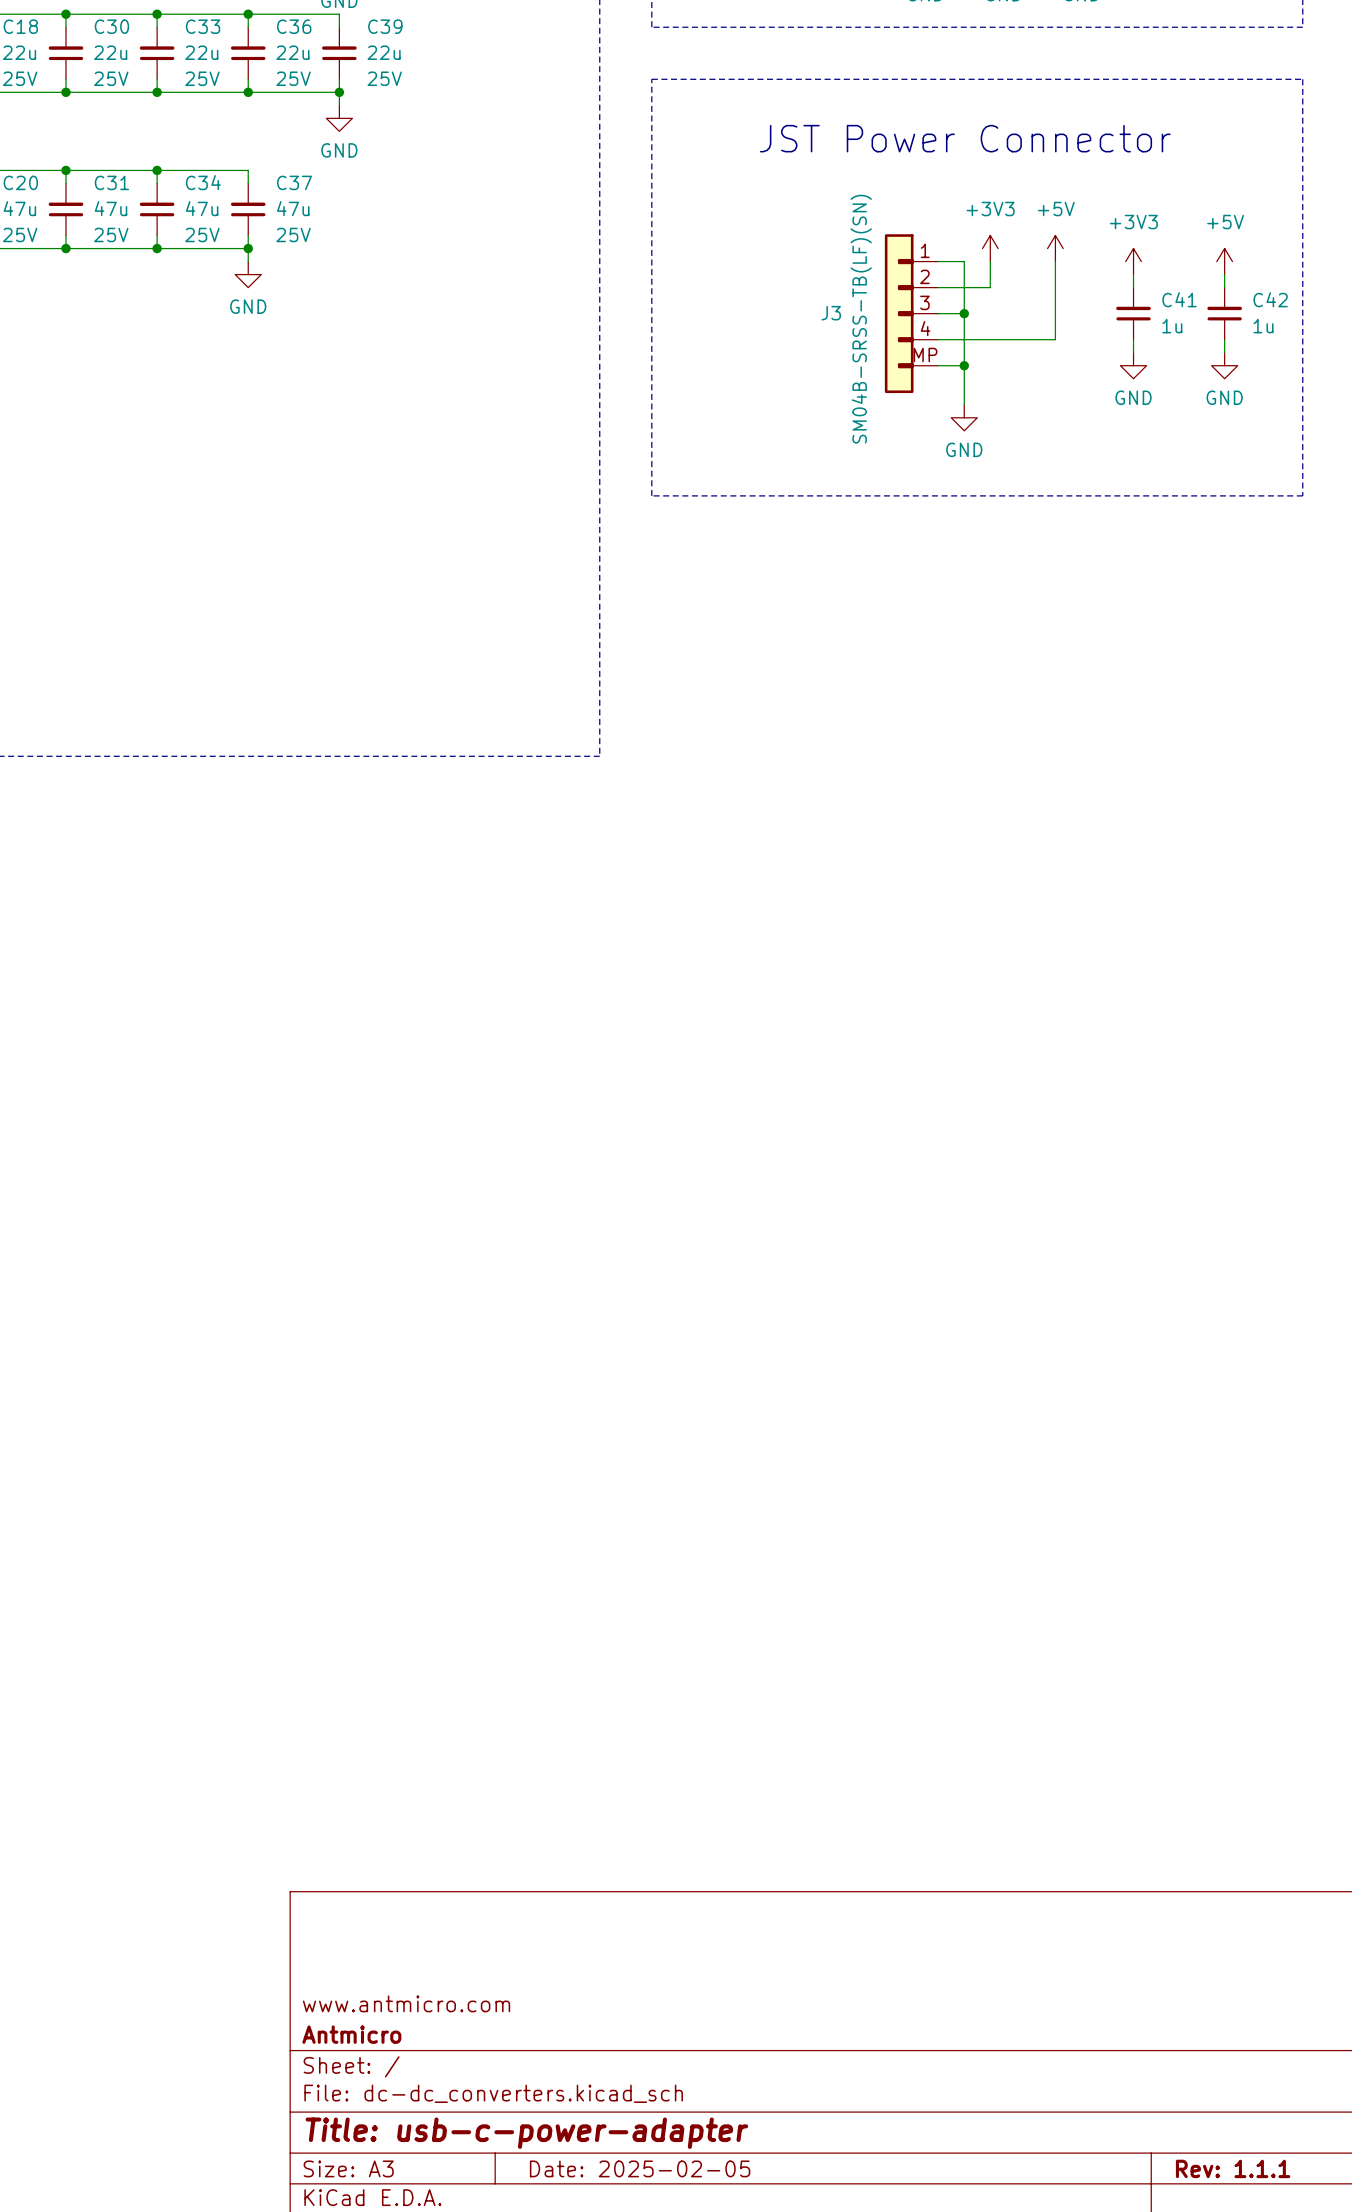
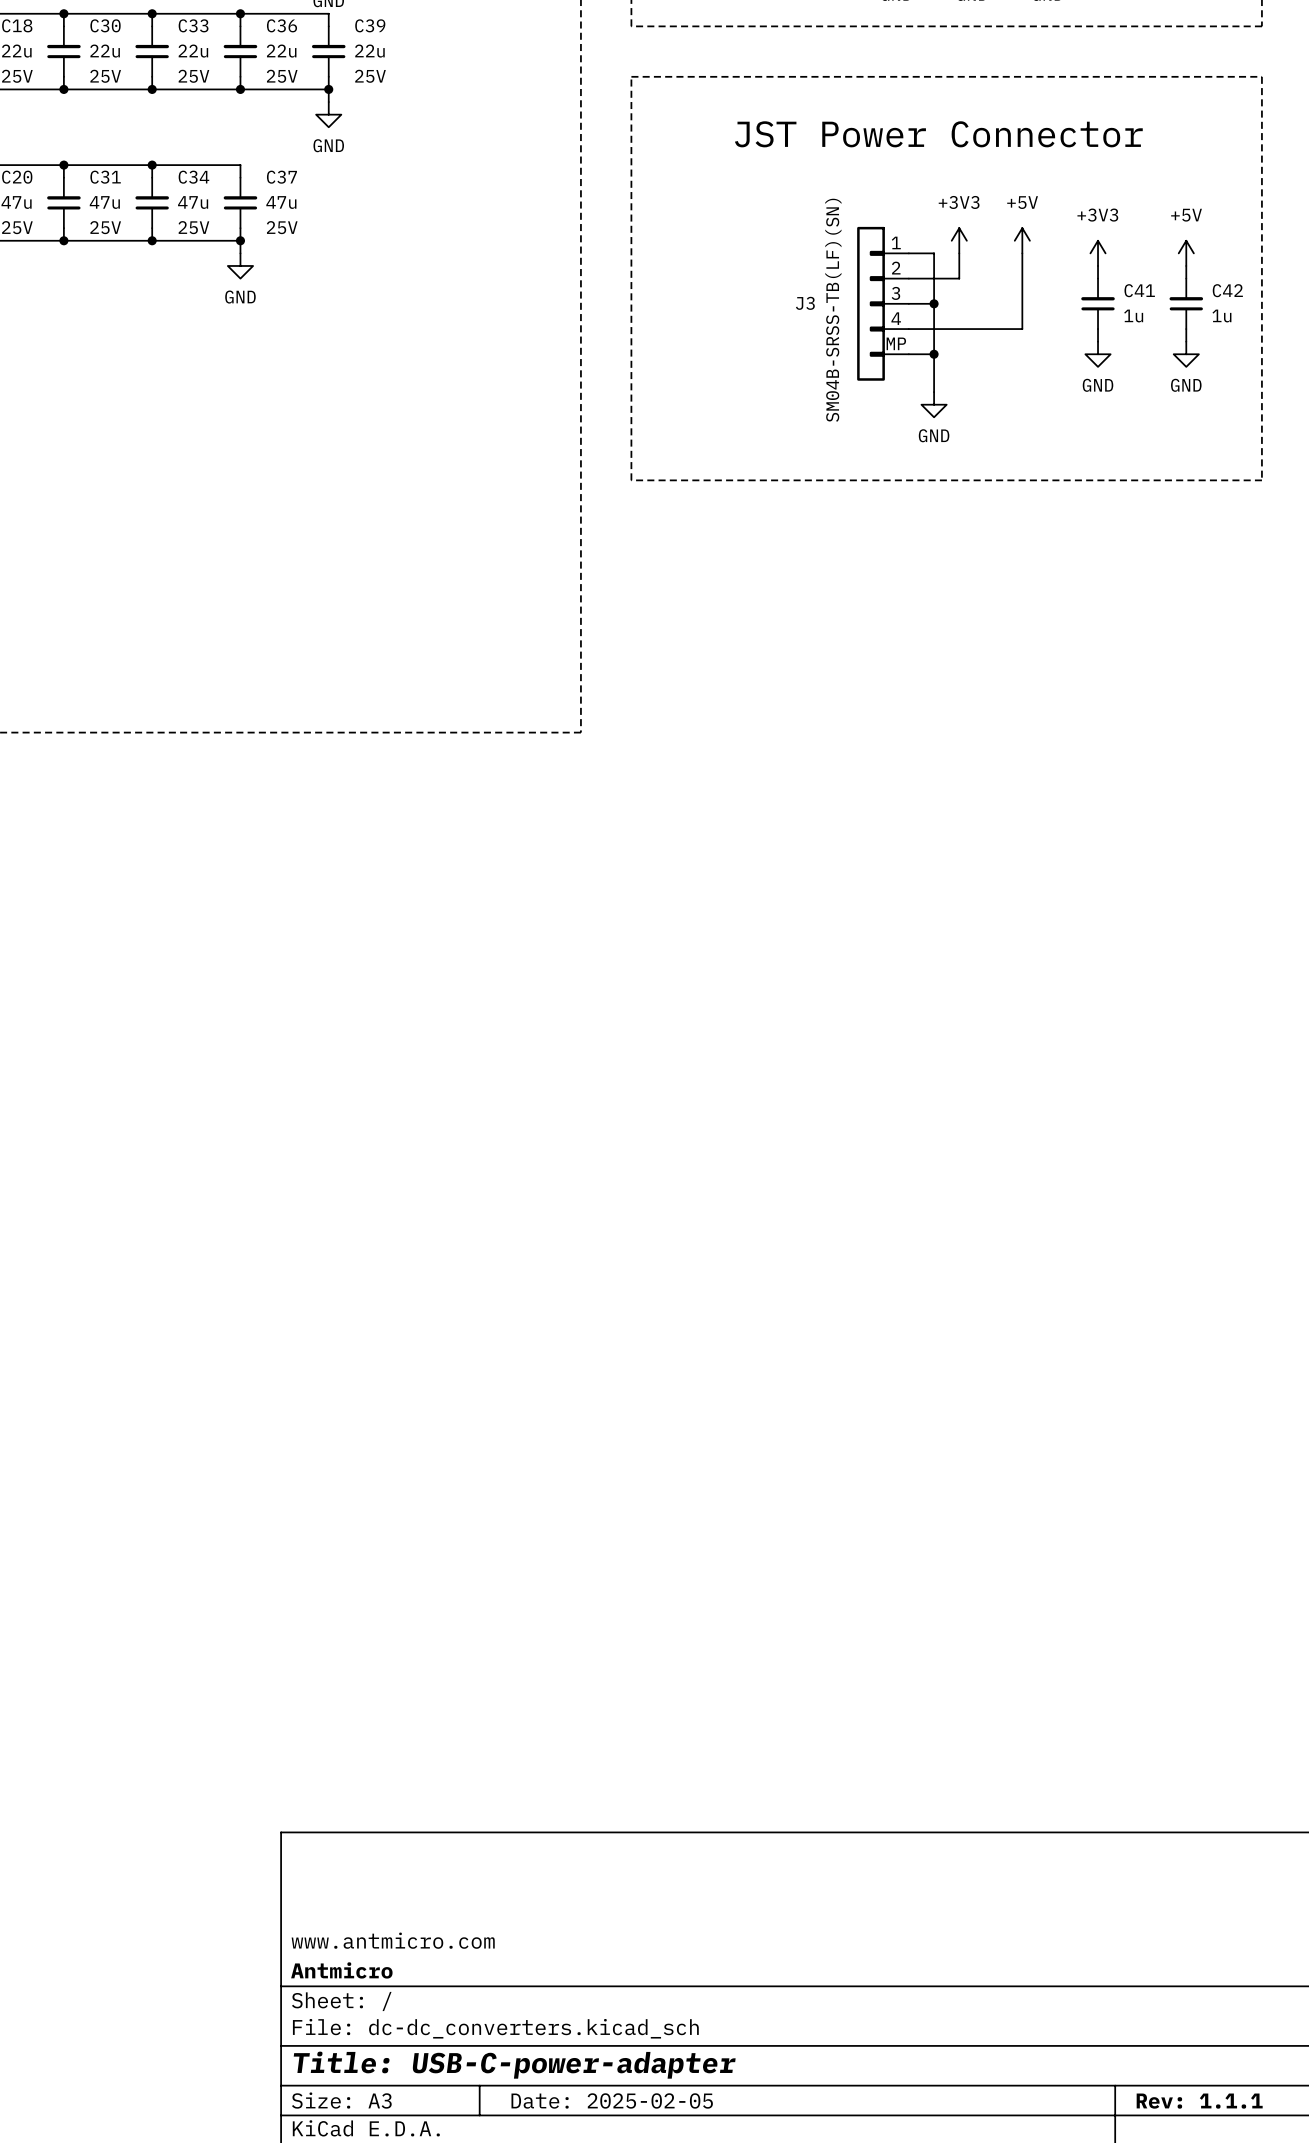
title block: Title: usb-c-power-adapter (526, 2133) -> Title: USB-C-power-adapter (514, 2065)

